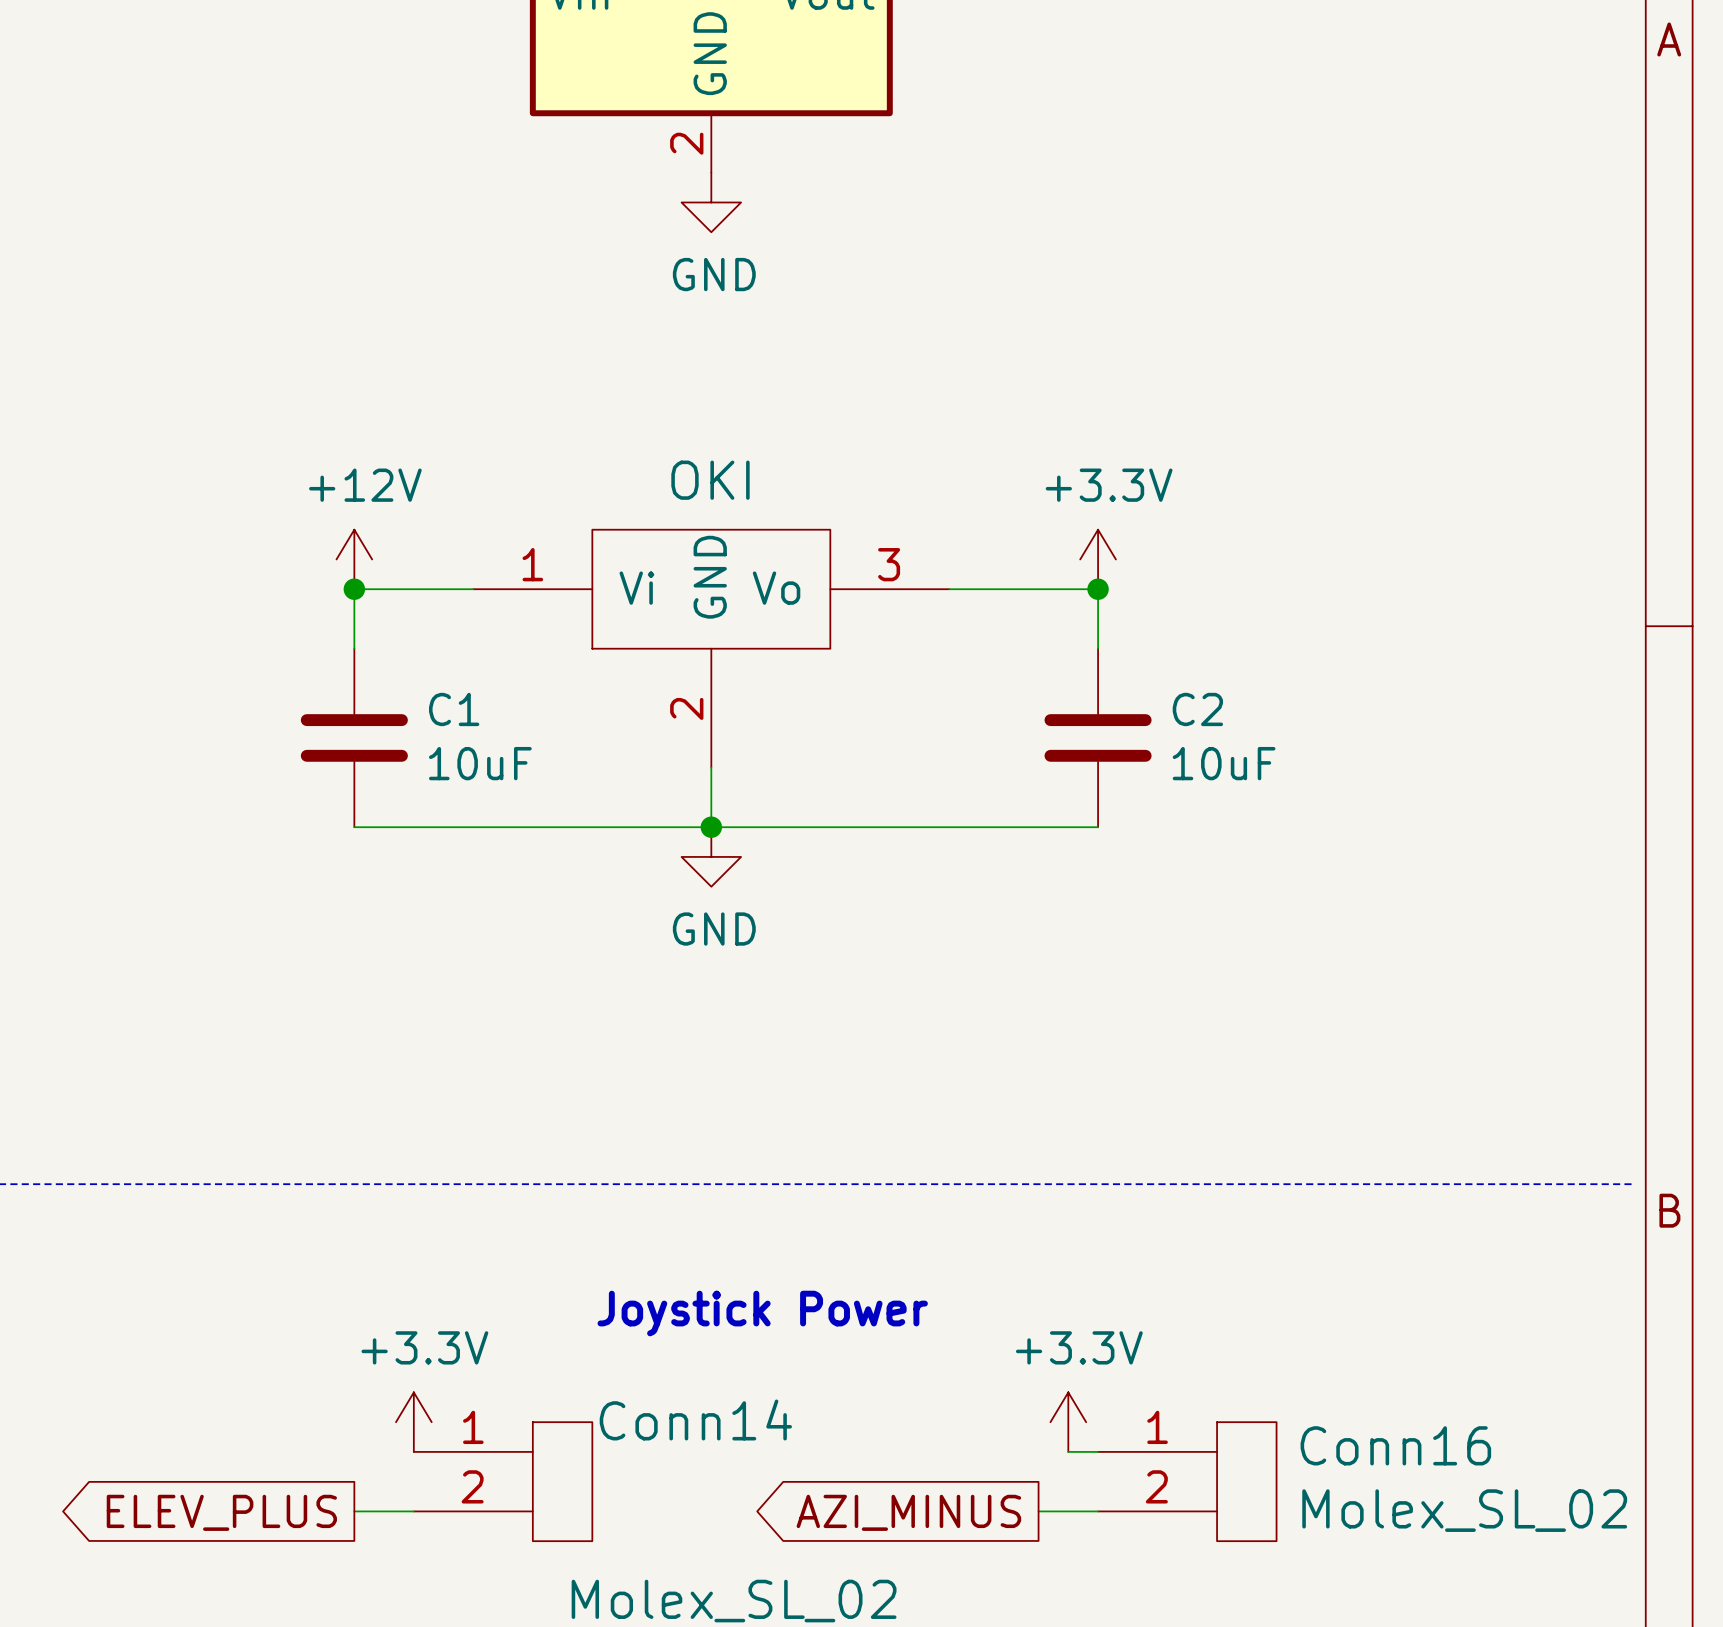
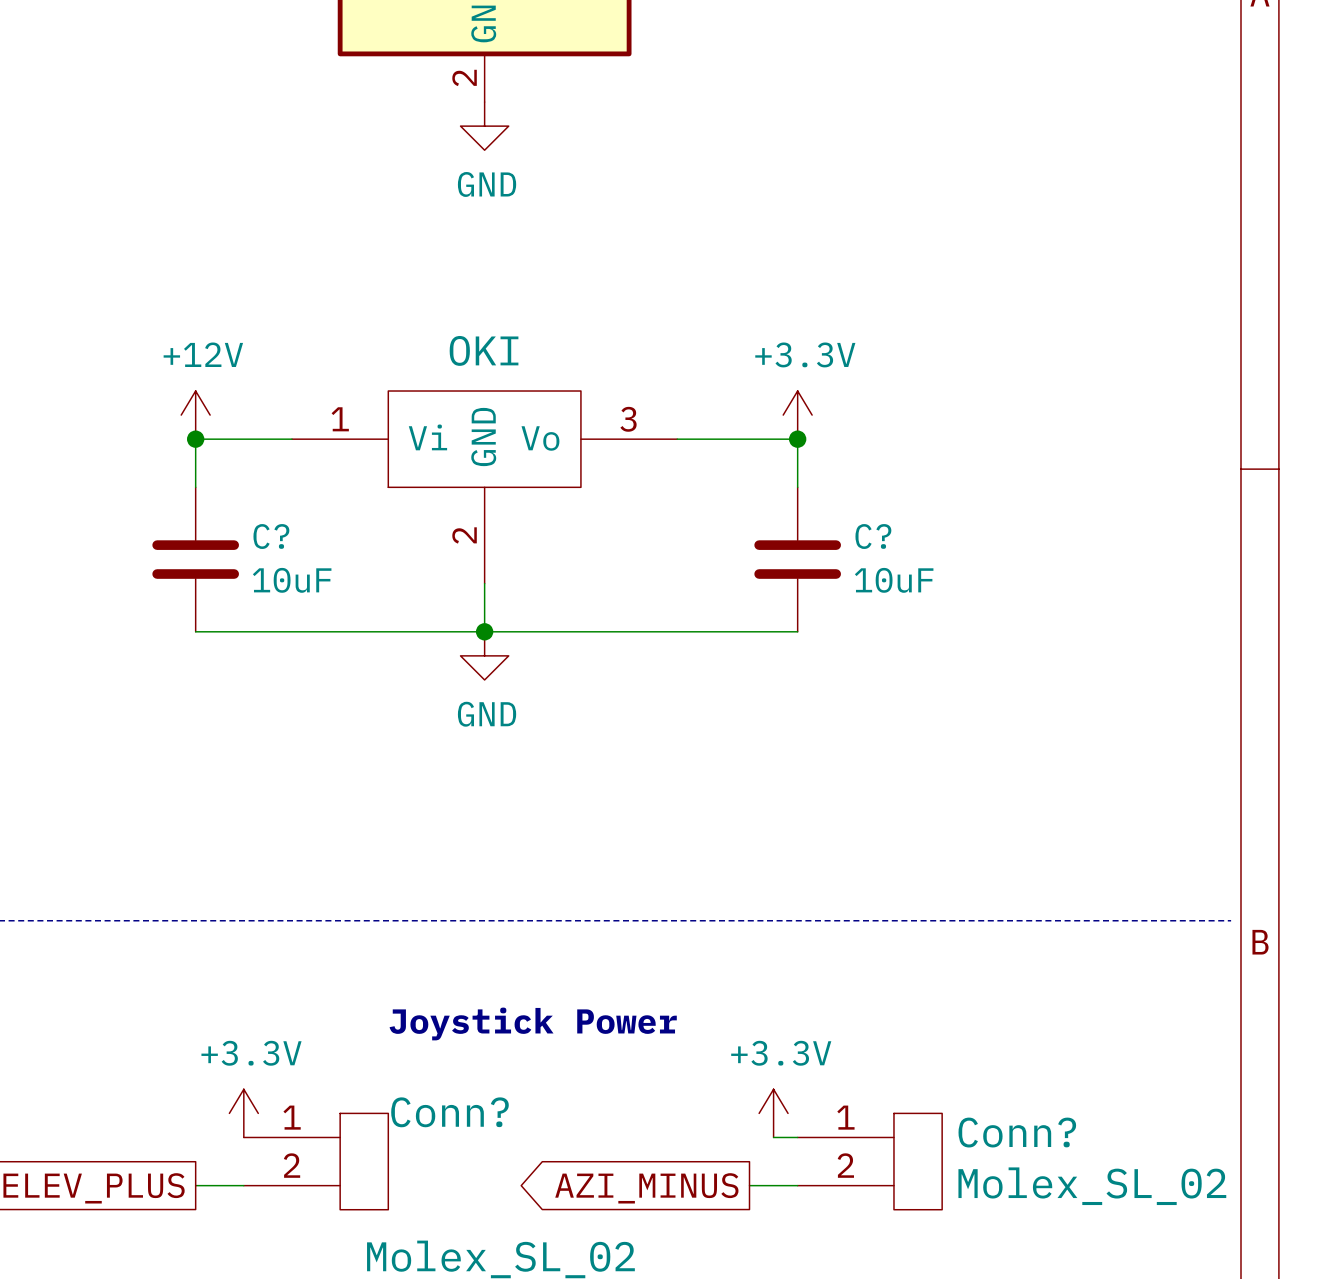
C1 name: C1 (454, 709) -> C? (271, 536)
C2 name: C2 (1197, 709) -> C? (873, 536)
Conn14 name: Conn14 (695, 1419) -> Conn? (449, 1112)
Conn16 name: Conn16 (1395, 1445) -> Conn? (1017, 1132)

